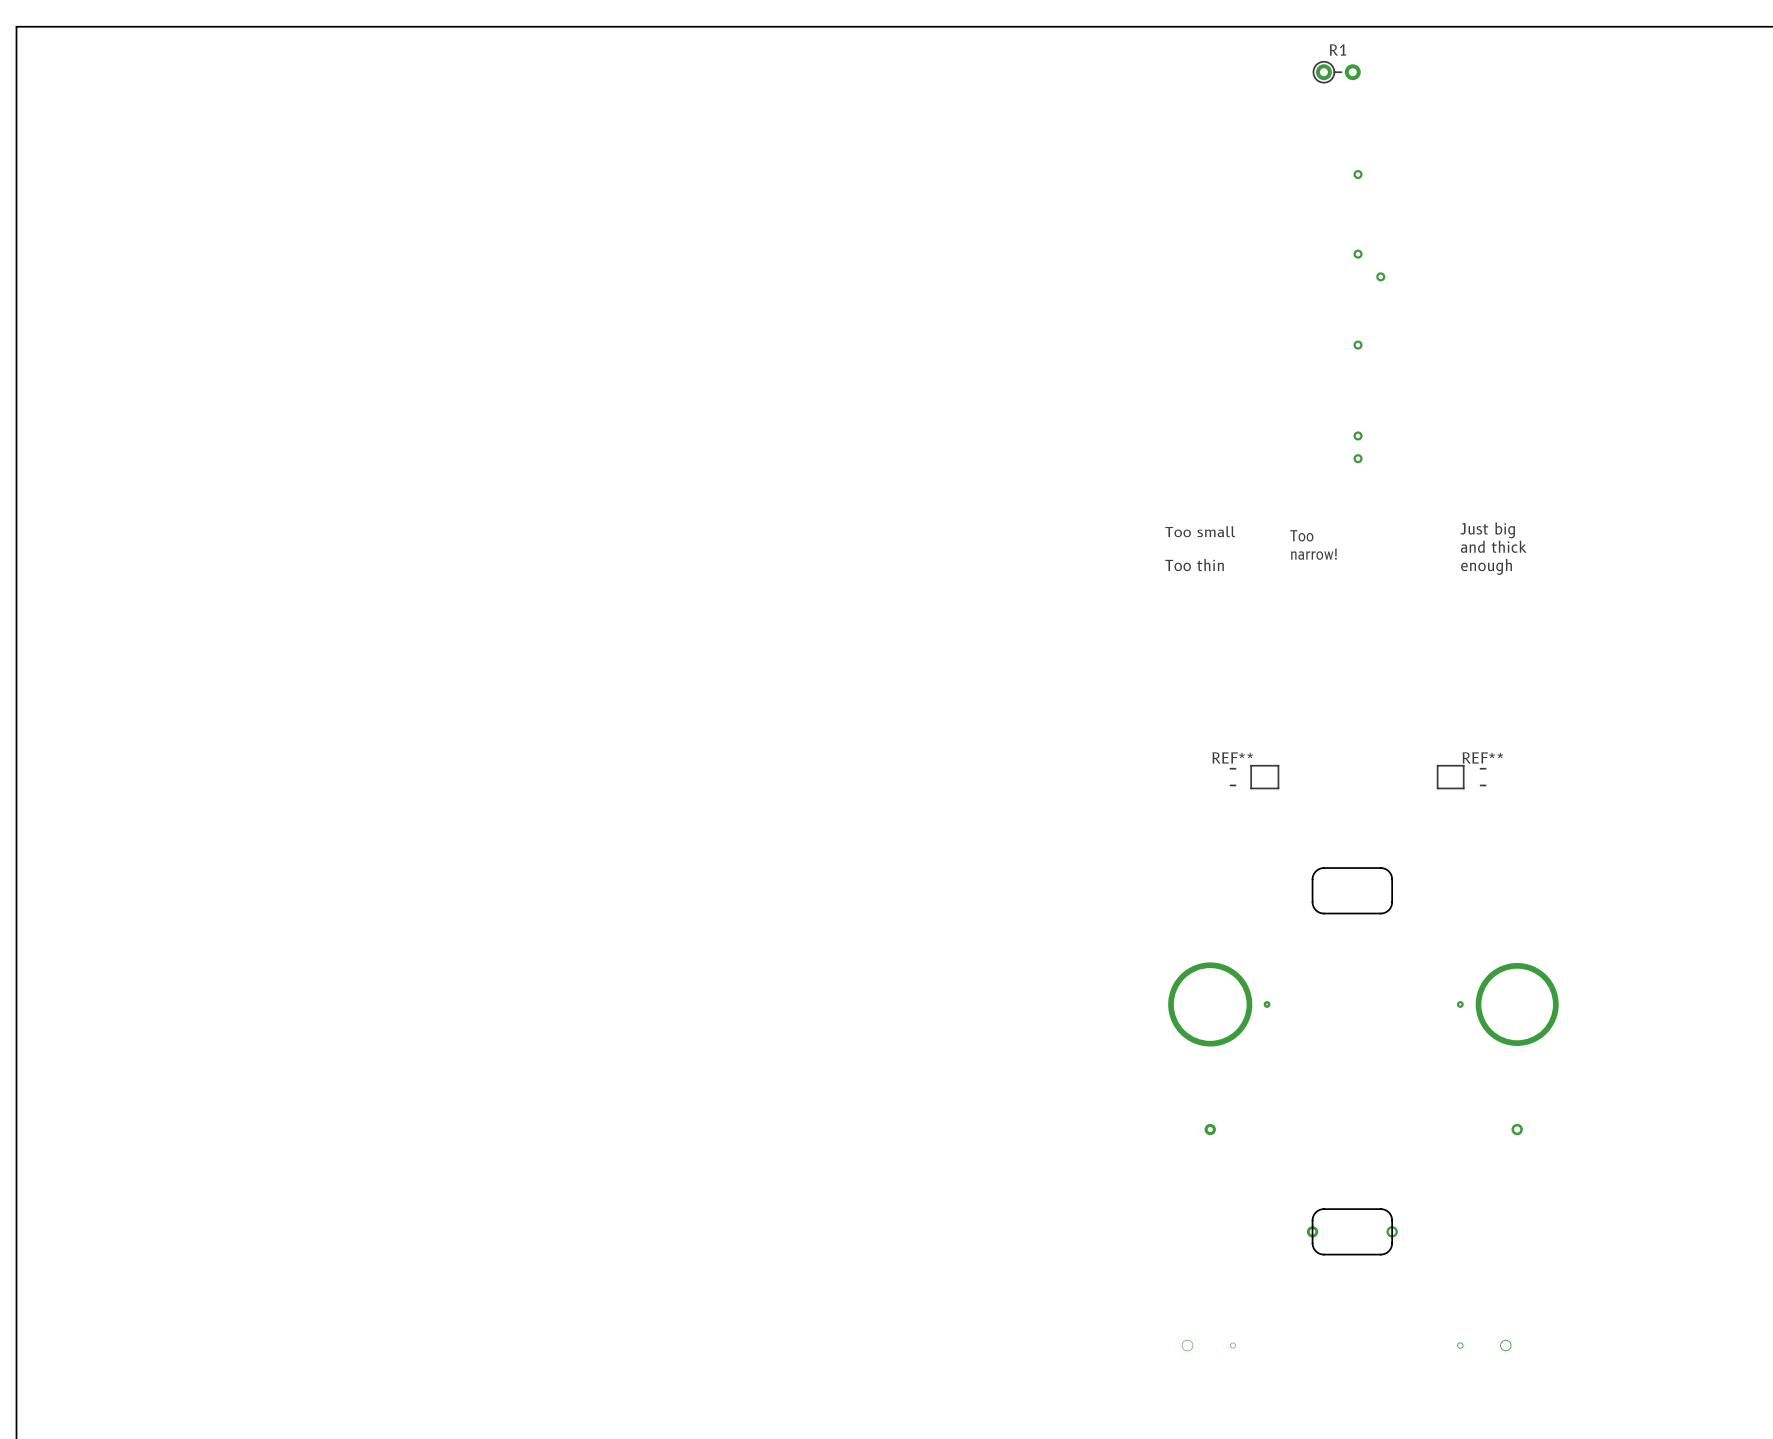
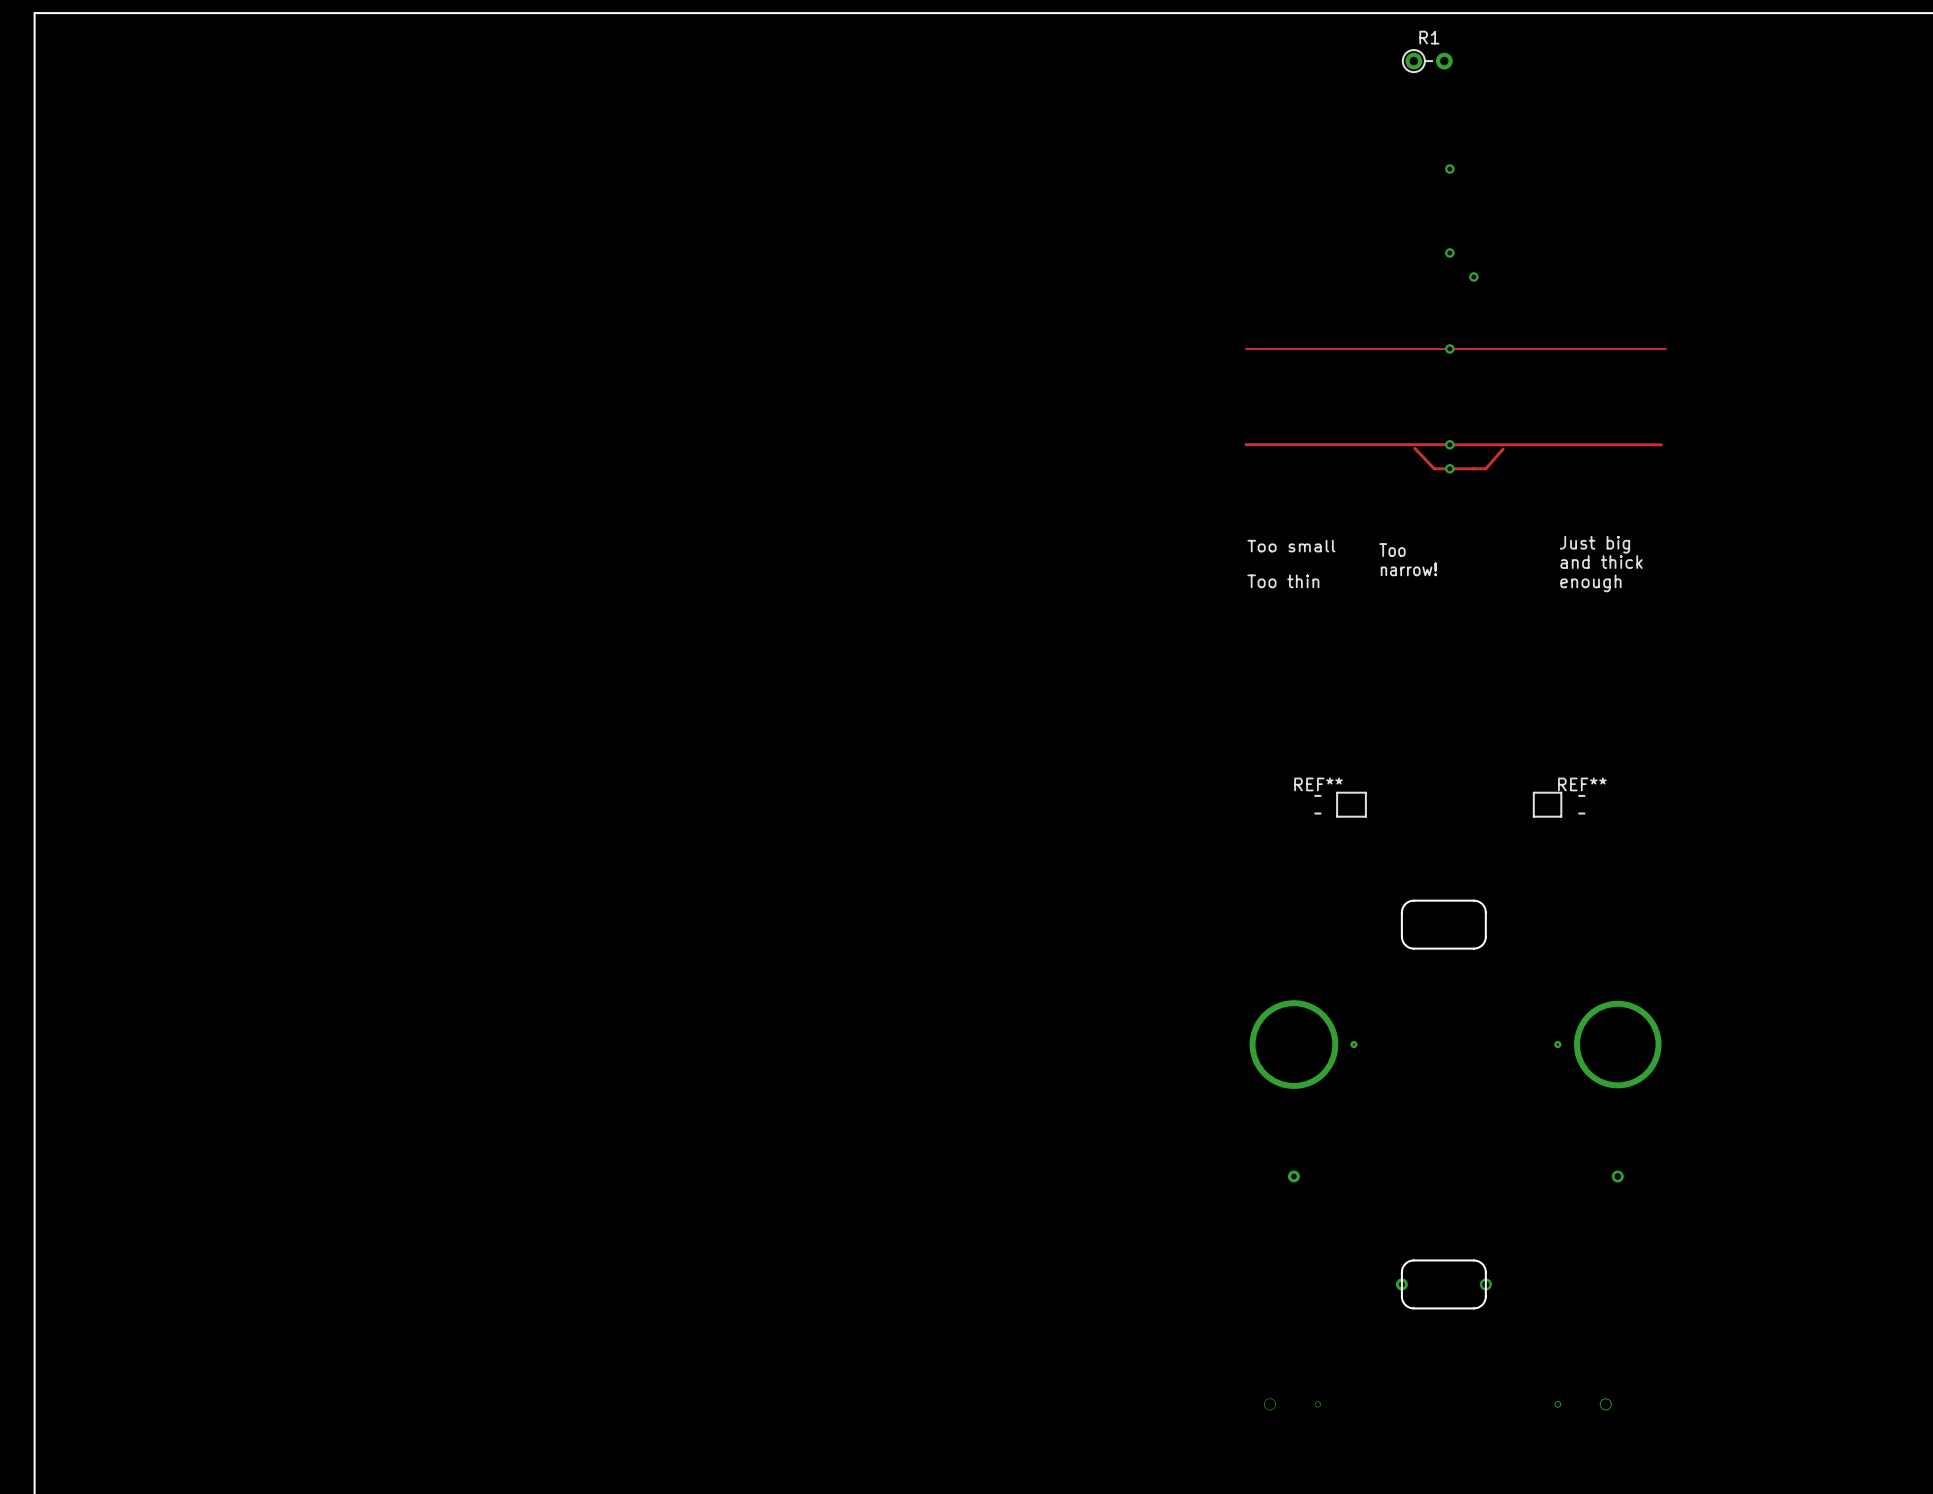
track: none -> (1245, 348) (1665, 348)
track: none -> (1246, 444) (1449, 444)
track: none -> (1449, 444) (1661, 444)
track: none -> (1414, 448) (1434, 468) (1485, 468) (1503, 449)

